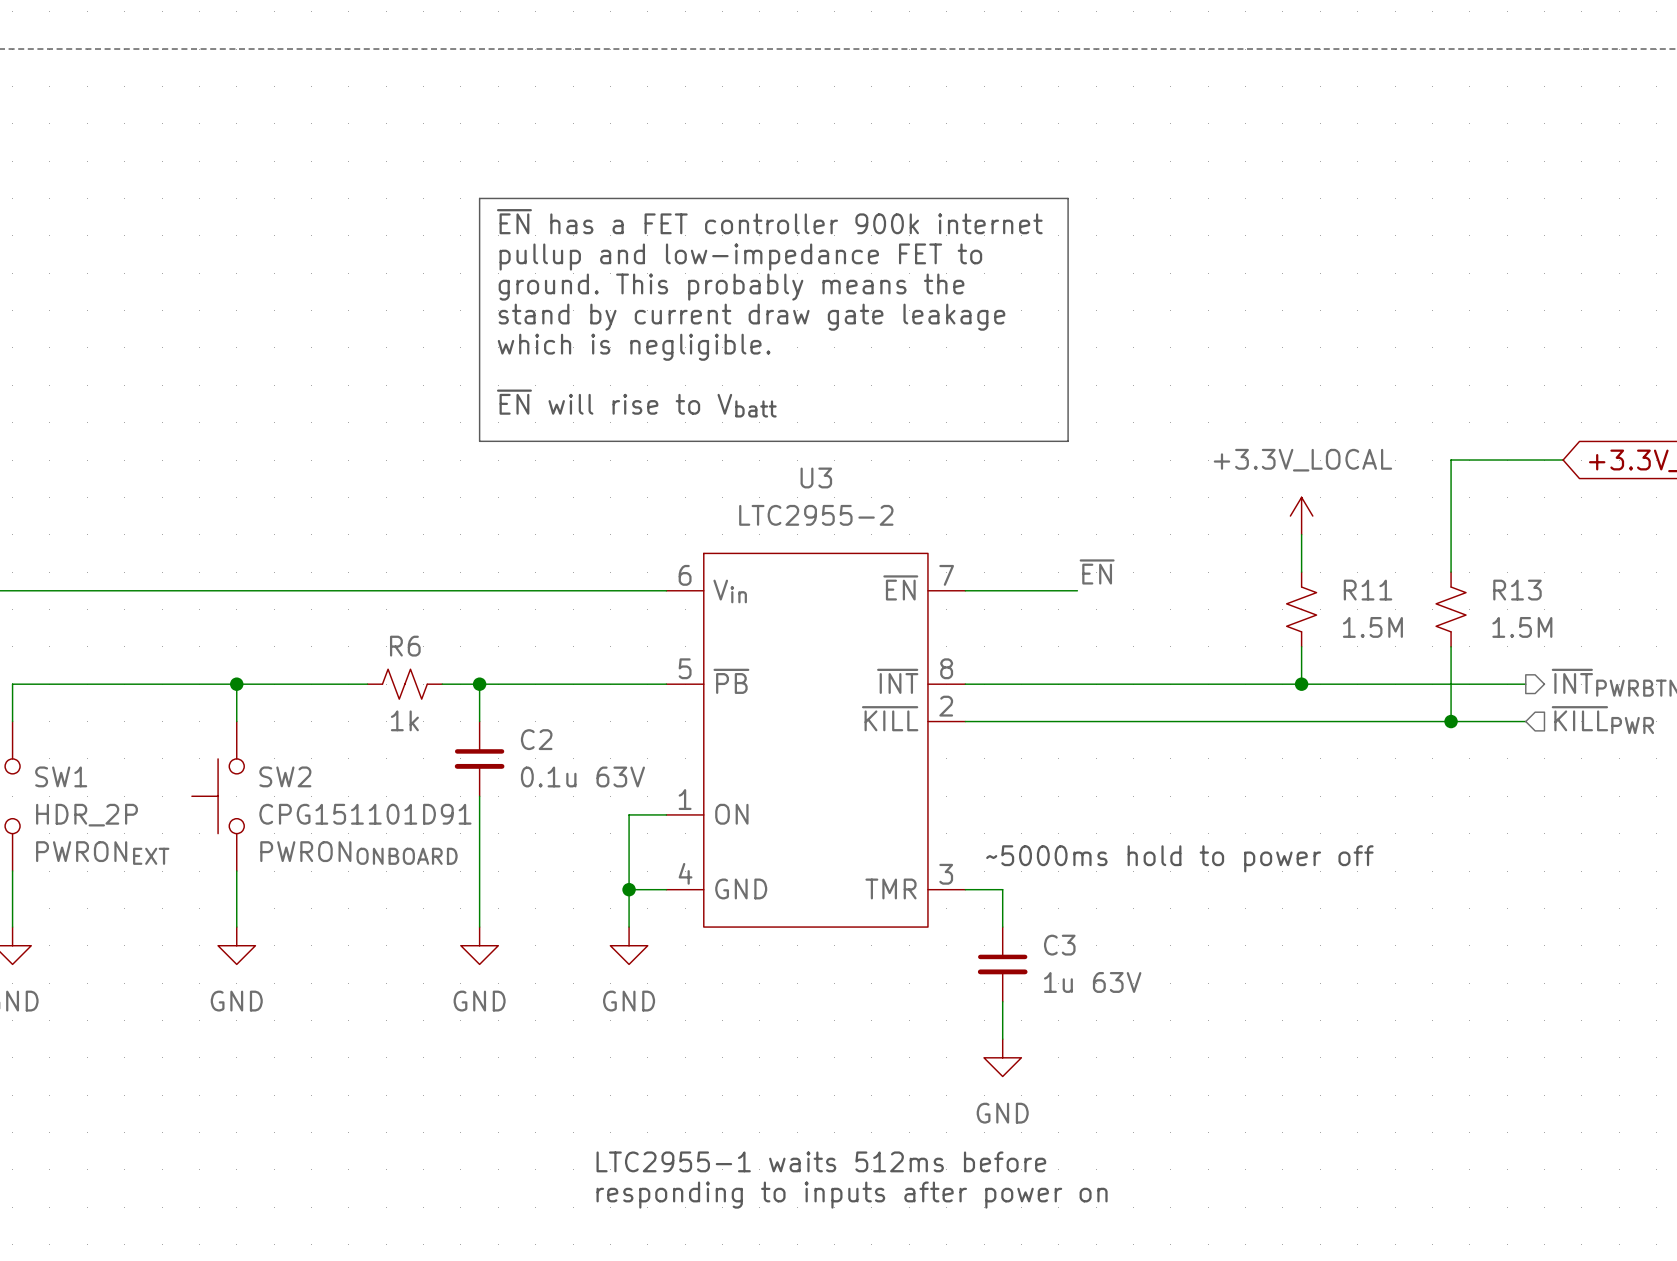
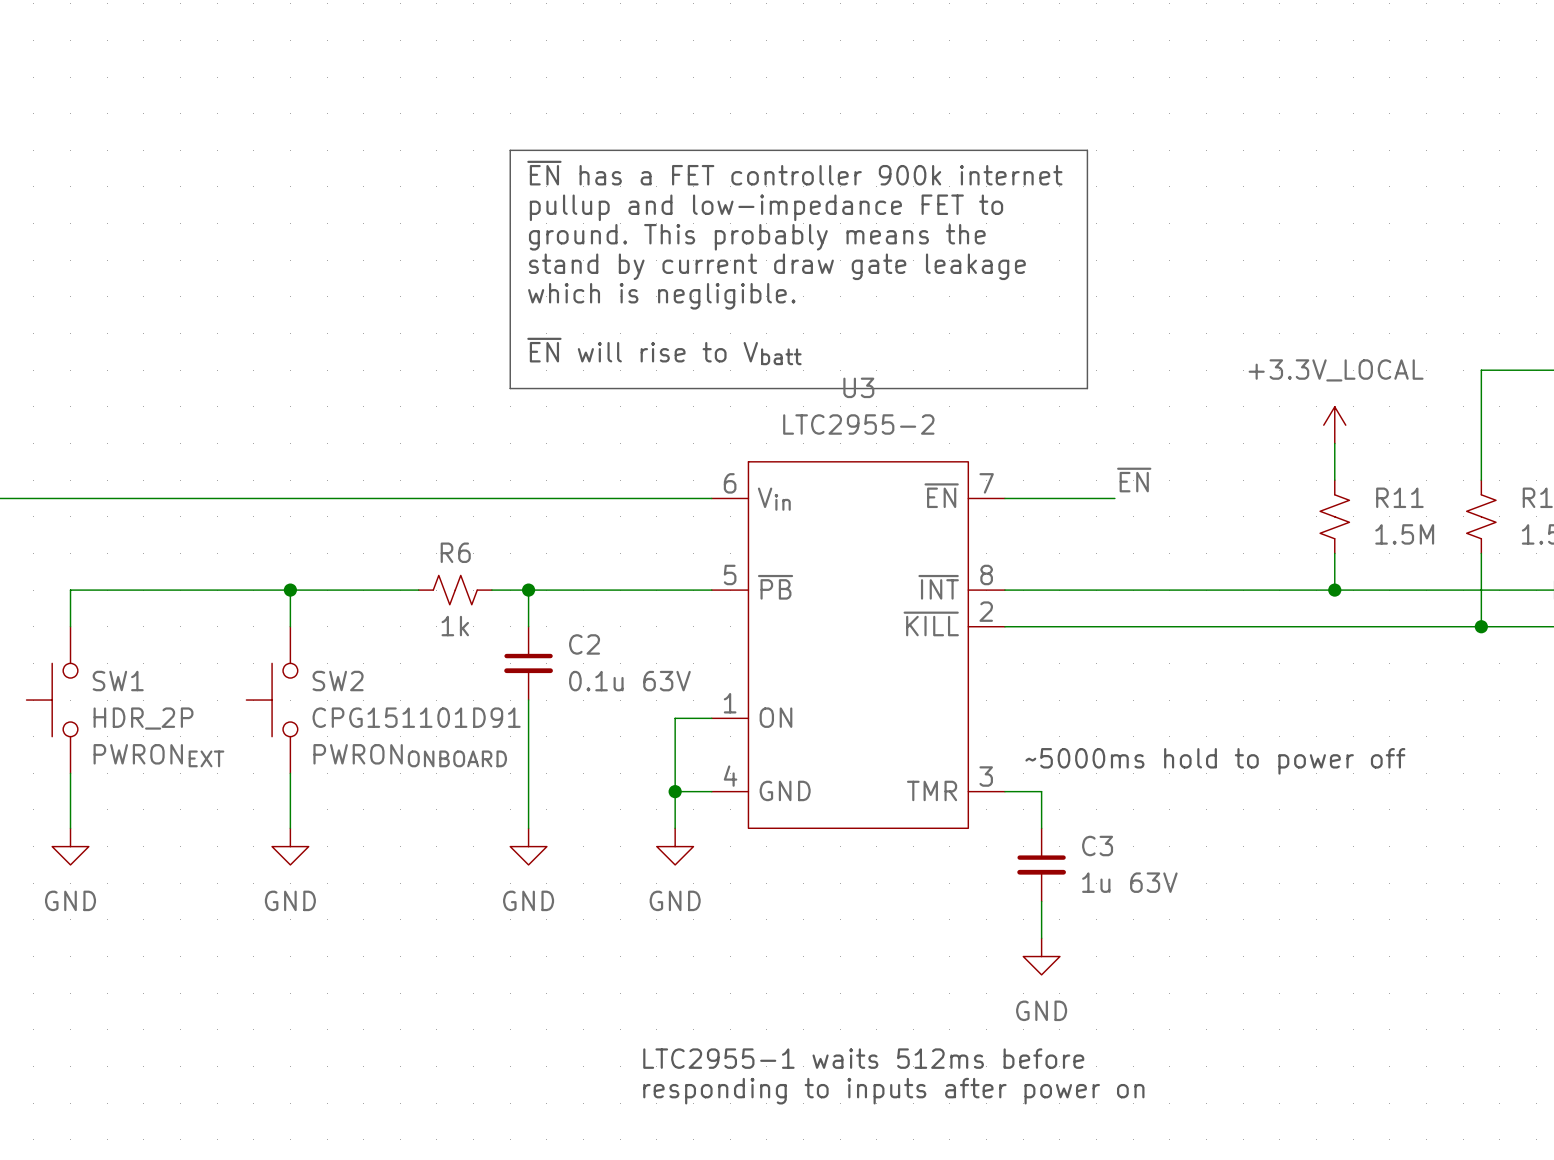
line: (479, 198) (1068, 198) (1068, 441) (479, 441) (479, 198) -> (510, 150) (510, 388) (1087, 388) (1087, 150) (510, 150)
text position: ~{EN} has a FET controller 900k internet (769, 221) -> ~{EN} has a FET controller 900k internet (794, 173)
text position: pullup and low-impedance FET to (740, 257) -> pullup and low-impedance FET to (766, 207)
text position: ground. This probably means the (731, 287) -> ground. This probably means the (757, 237)
text position: stand by current draw gate leakage (751, 317) -> stand by current draw gate leakage (777, 266)
text position: which is negligible. (634, 347) -> which is negligible. (661, 296)
text position: ~{EN} will rise to Vbatt (636, 403) -> ~{EN} will rise to Vbatt (664, 351)

